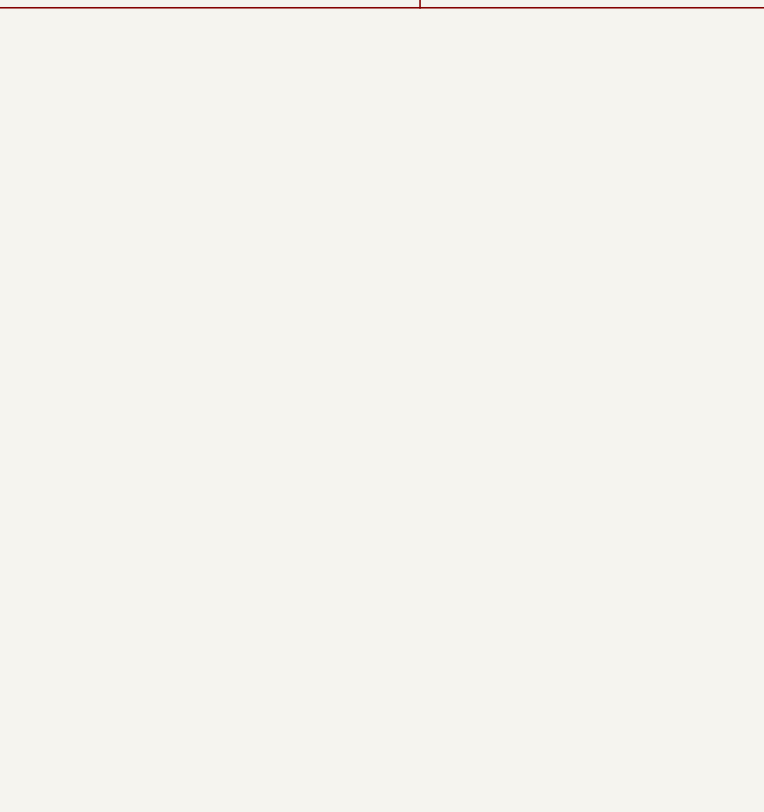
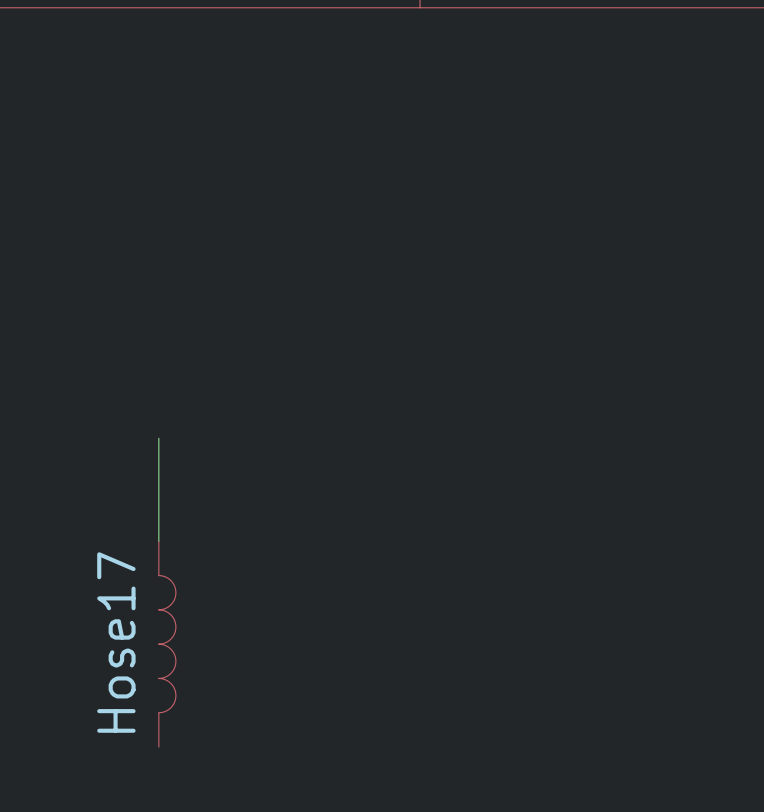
wire: none -> (158, 438) (158, 541)
Hose17: none -> (167, 644)

